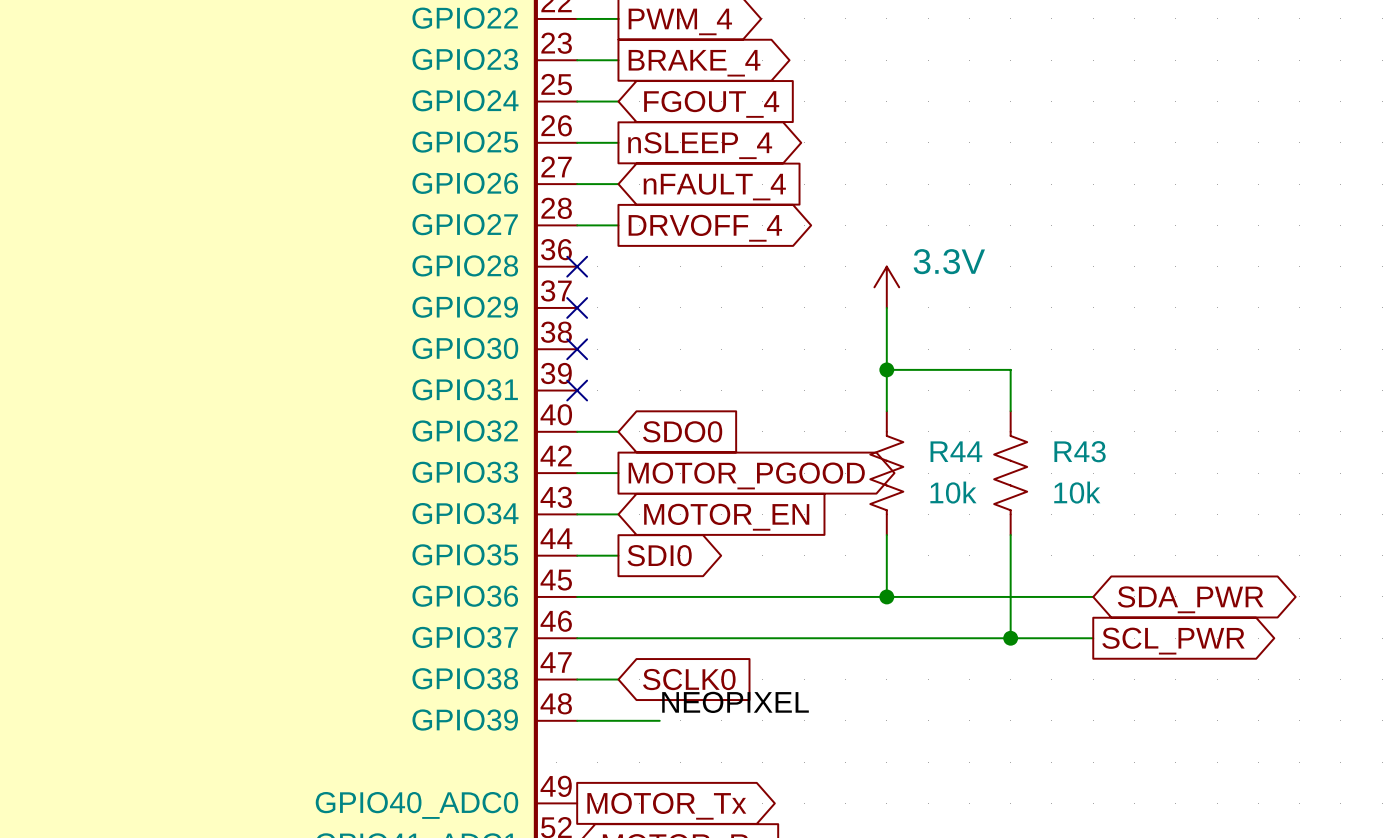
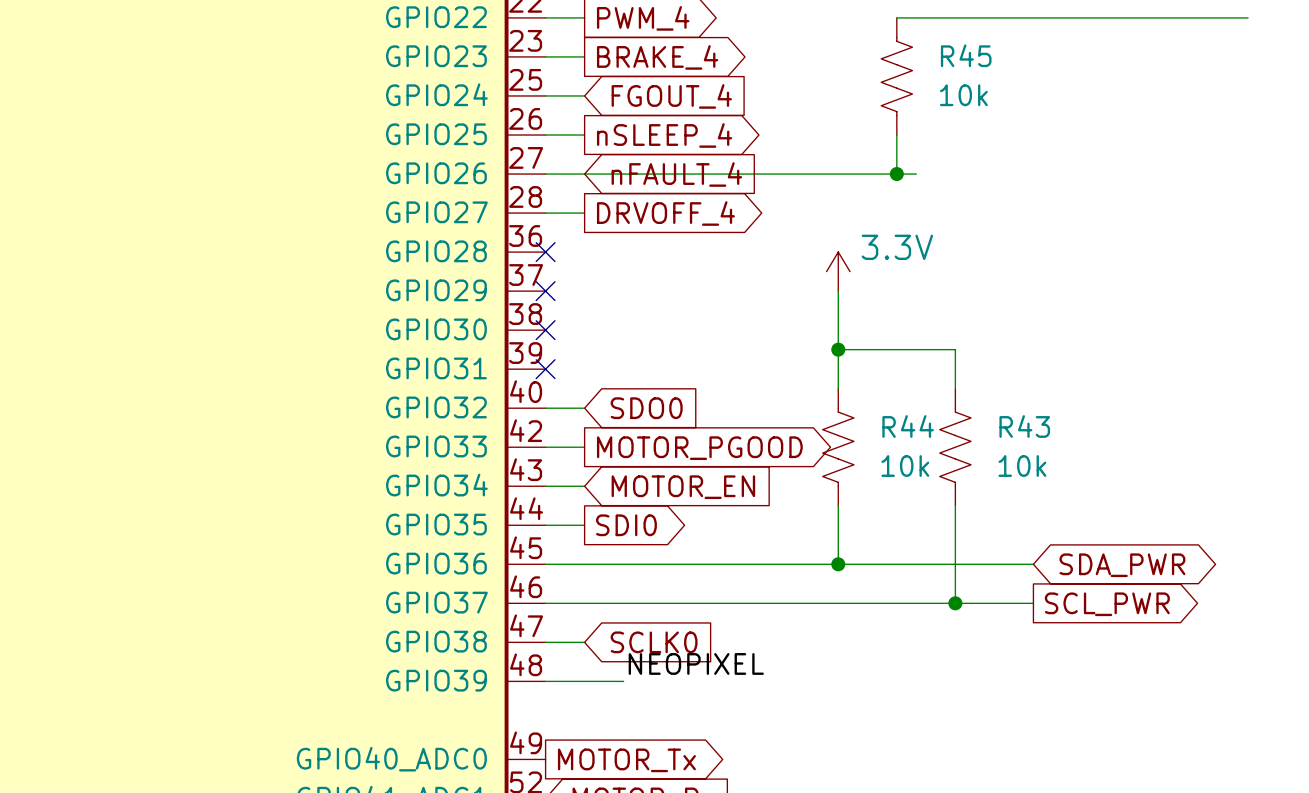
wire: none -> (896, 17) (1248, 17)
R45: none -> 10k (896, 76)
wire: none -> (896, 135) (896, 174)
wire: none -> (584, 174) (916, 174)
junction: none -> (896, 174)

